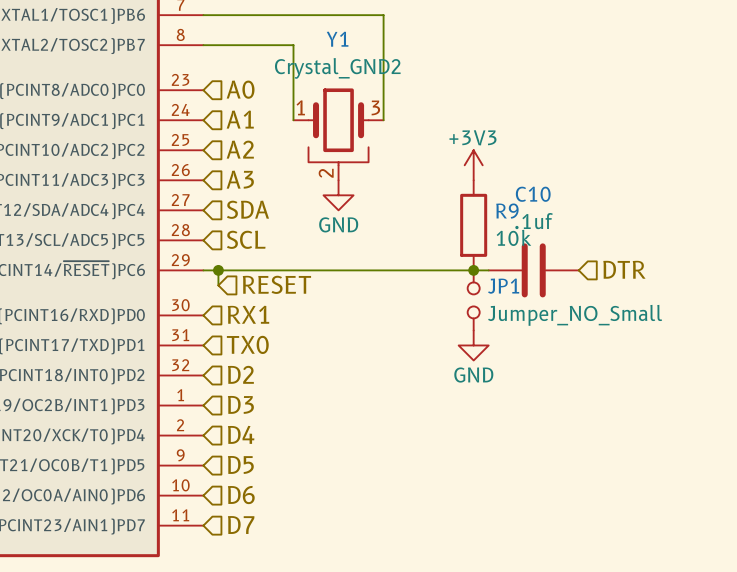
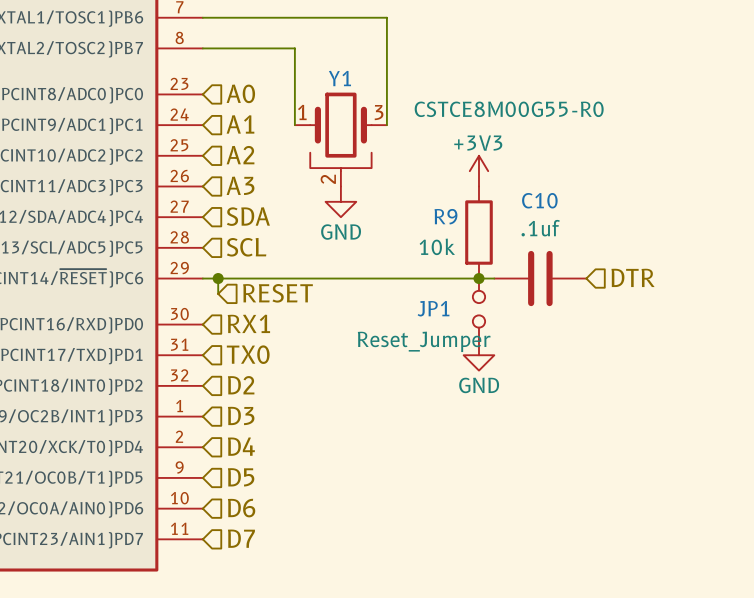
Y1 name position: Y1 (337, 39) -> Y1 (339, 78)
Y1 value: Crystal_GND2 (337, 68) -> CSTCE8M00G55-R0 (509, 109)
R9 name position: R9 (507, 211) -> R9 (445, 216)
R9 value position: 10k (513, 237) -> 10k (437, 246)
JP1 name position: JP1 (503, 286) -> JP1 (433, 308)
JP1 value: Jumper_NO_Small (575, 315) -> Reset_Jumper (424, 341)

